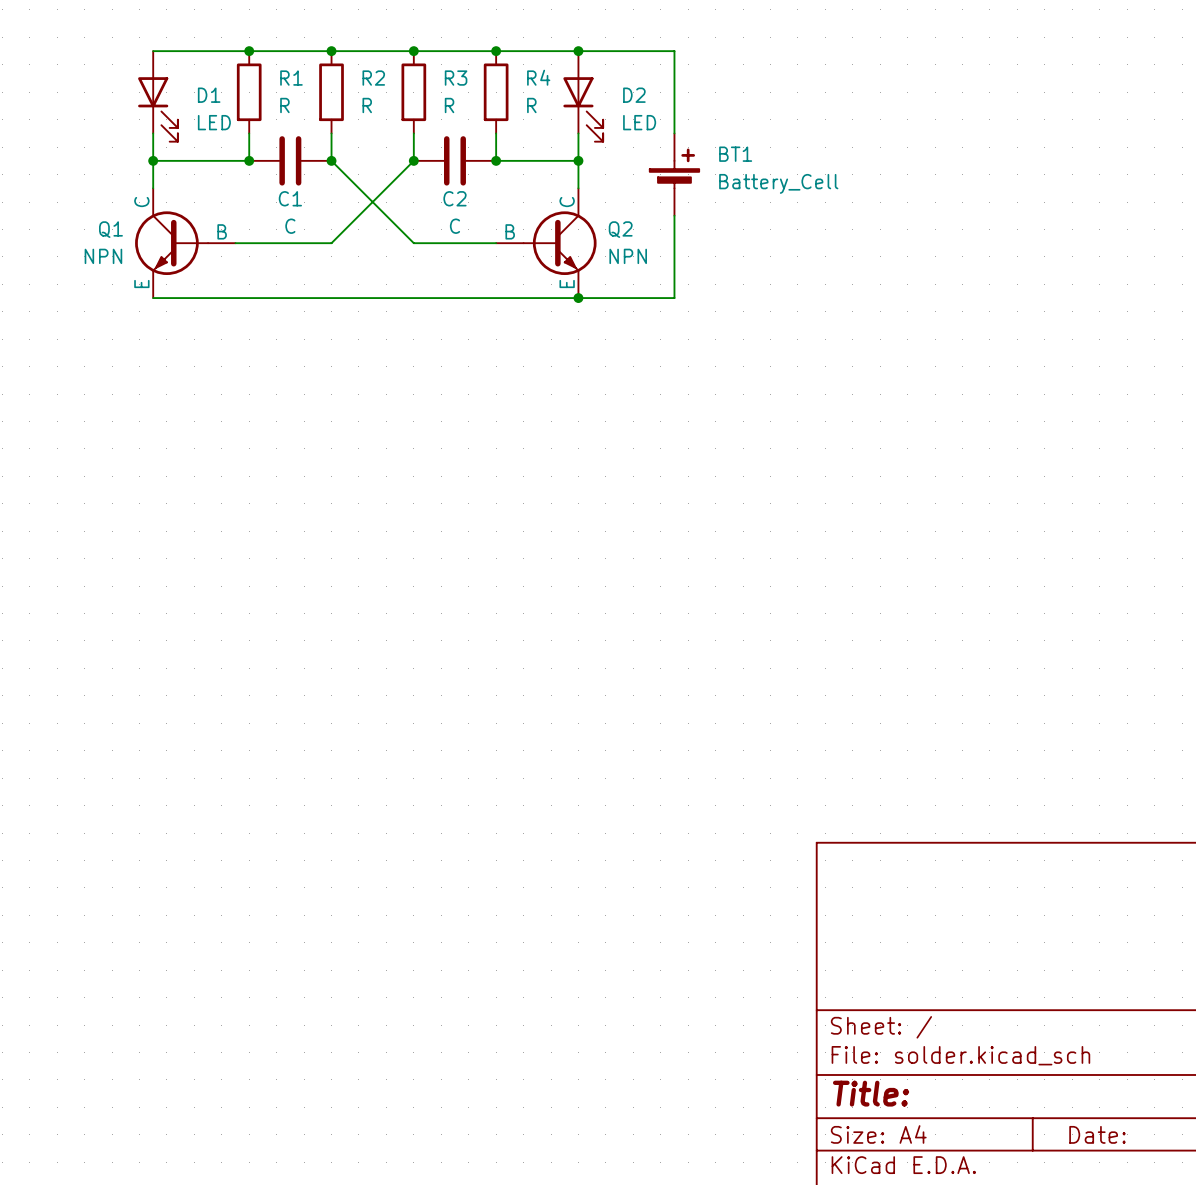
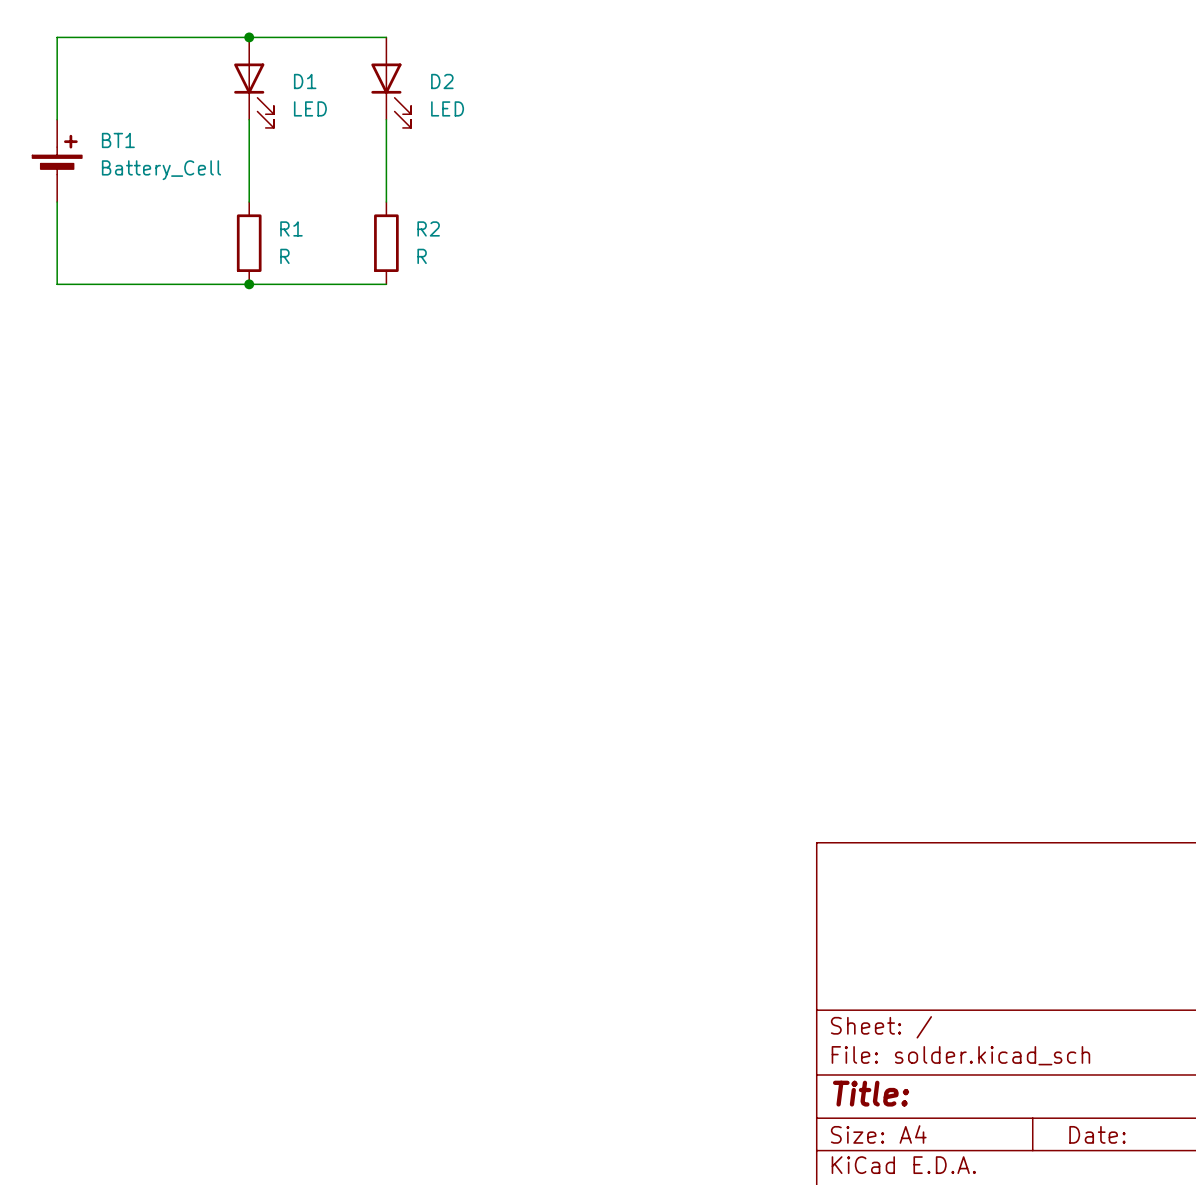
wire: none -> (386, 37) (57, 37) (57, 119)
wire: (153, 51) (674, 51) (674, 133) -> none
junction position: (249, 51) -> (249, 37)
junction: (331, 51) -> none
junction: (413, 51) -> none
junction: (496, 51) -> none
junction: (578, 51) -> none
R1 position: (249, 92) -> (249, 243)
R2 position: (331, 92) -> (386, 243)
R3: R (413, 92) -> none
R4: R (496, 92) -> none
D1 position: (157, 96) -> (254, 82)
D2 position: (583, 96) -> (391, 82)
wire: none -> (386, 119) (386, 202)
wire: (153, 133) (153, 188) -> none
wire: (331, 133) (331, 160) (413, 243) (496, 243) -> none
wire: (413, 133) (413, 160) (331, 243) (235, 243) -> none
wire: (496, 133) (496, 160) (578, 160) -> none
wire: (578, 133) (578, 188) -> none
wire: (153, 160) (249, 160) -> (249, 202) (249, 160)
junction: (153, 160) -> none
junction: (249, 160) -> none
C1: C (290, 160) -> none
junction: (331, 160) -> none
junction: (413, 160) -> none
C2: C (454, 160) -> none
junction: (496, 160) -> none
junction: (578, 160) -> none
BT1 position: (674, 174) -> (57, 160)
wire: none -> (57, 202) (57, 284) (386, 284)
wire: (674, 215) (674, 298) (153, 298) -> none
Q1: NPN (185, 243) -> none
Q2: NPN (546, 243) -> none
junction: none -> (249, 284)
junction: (578, 298) -> none

